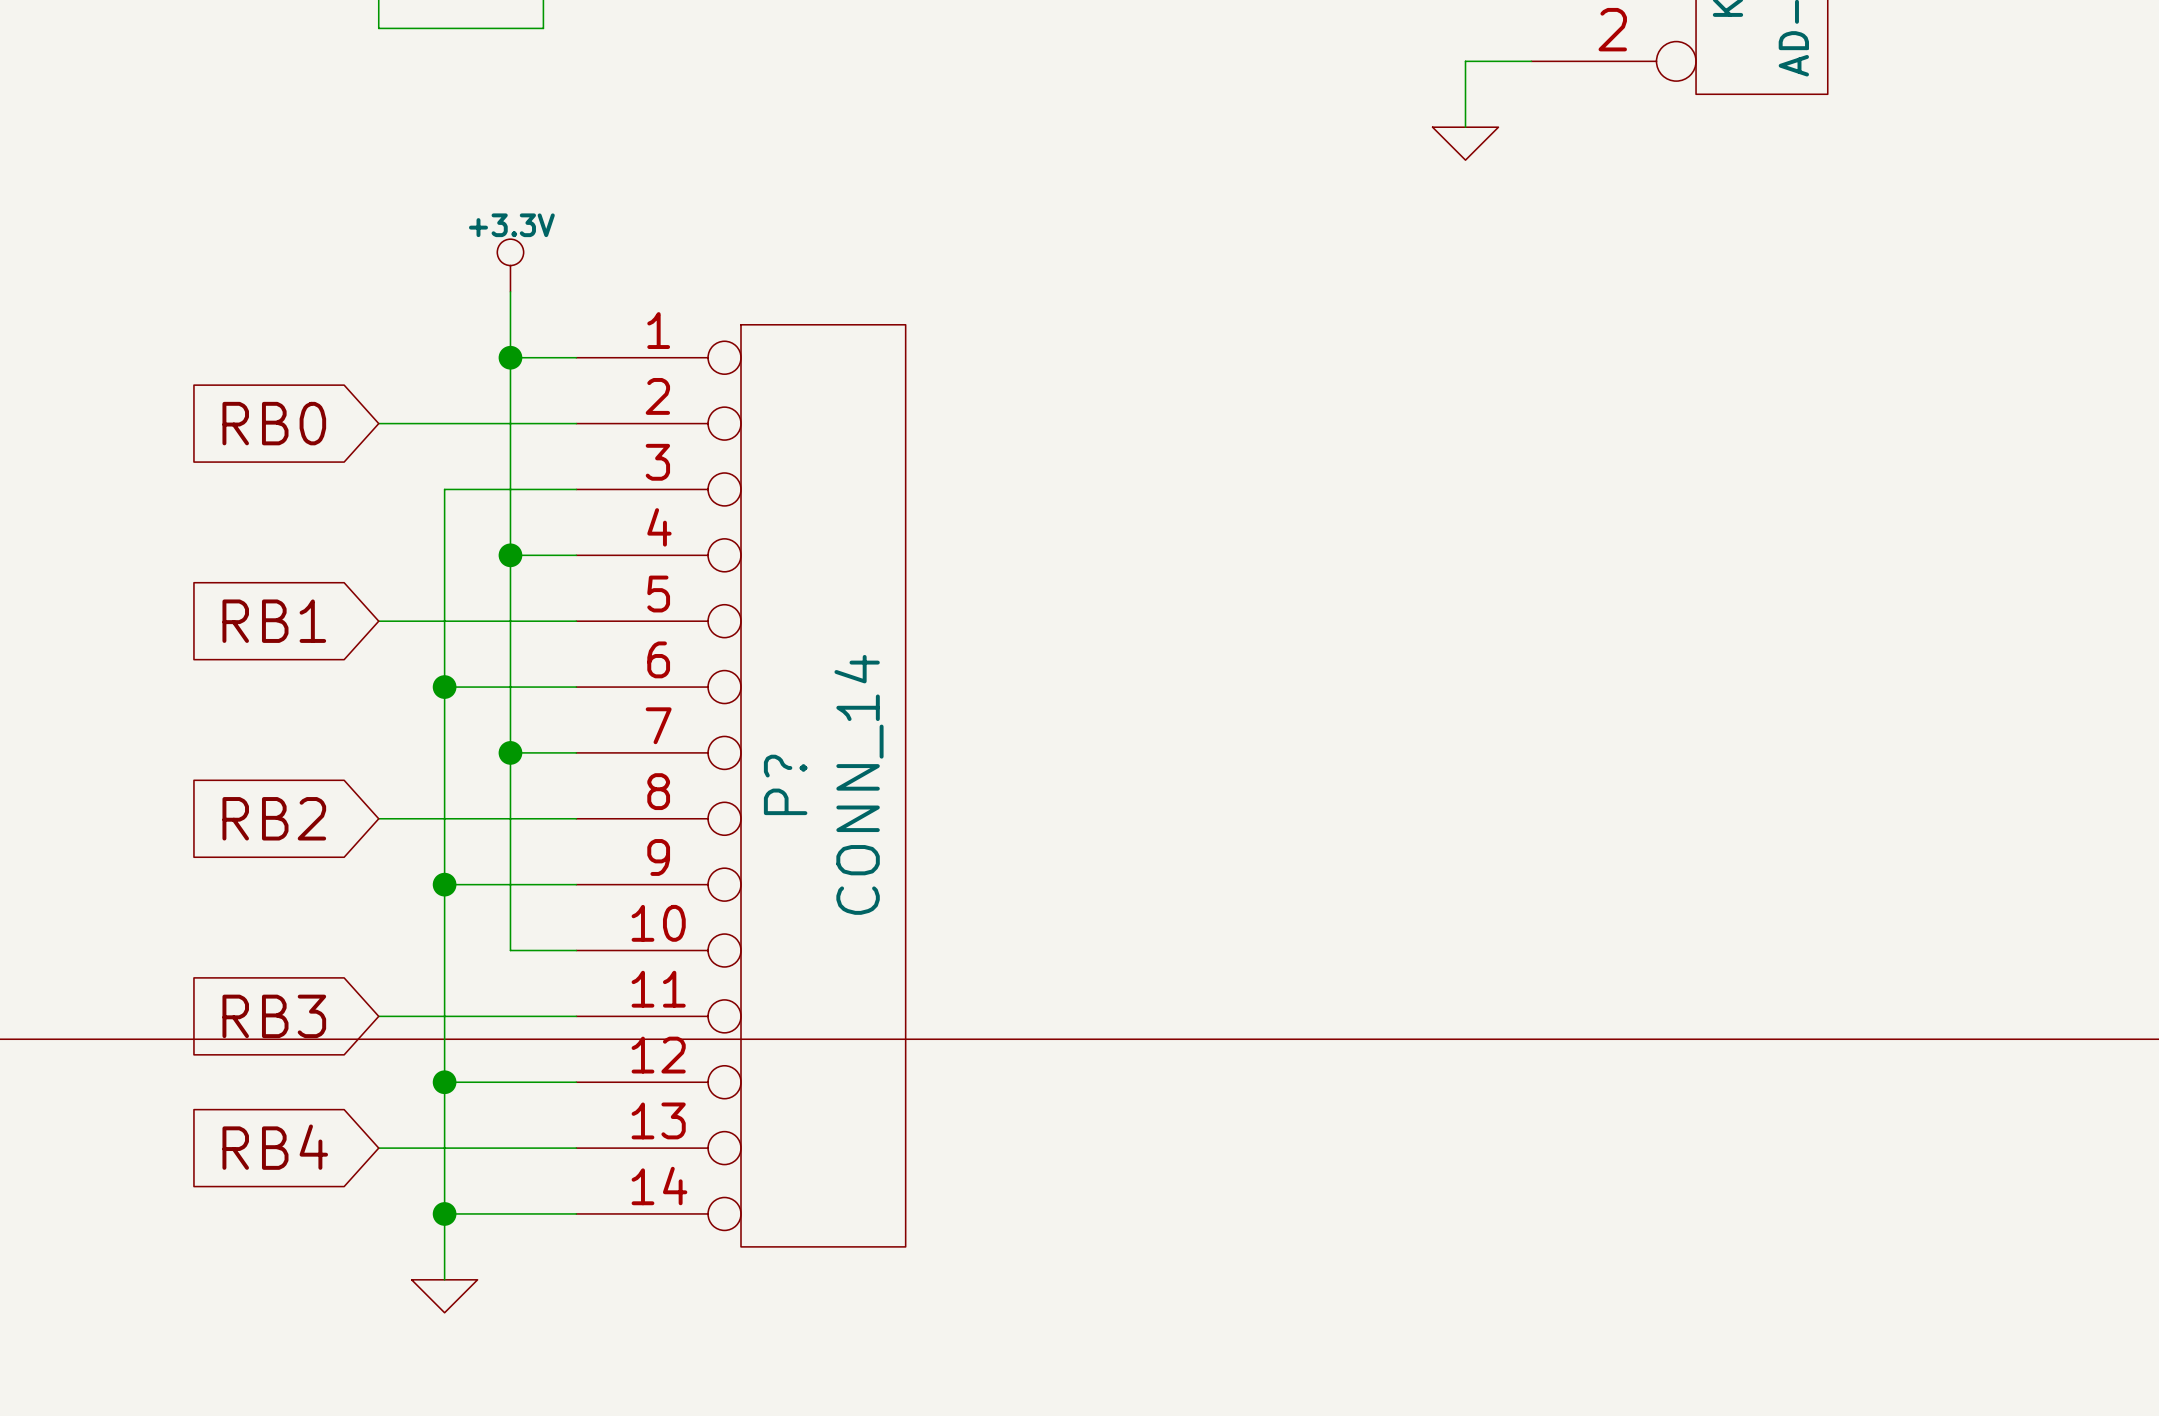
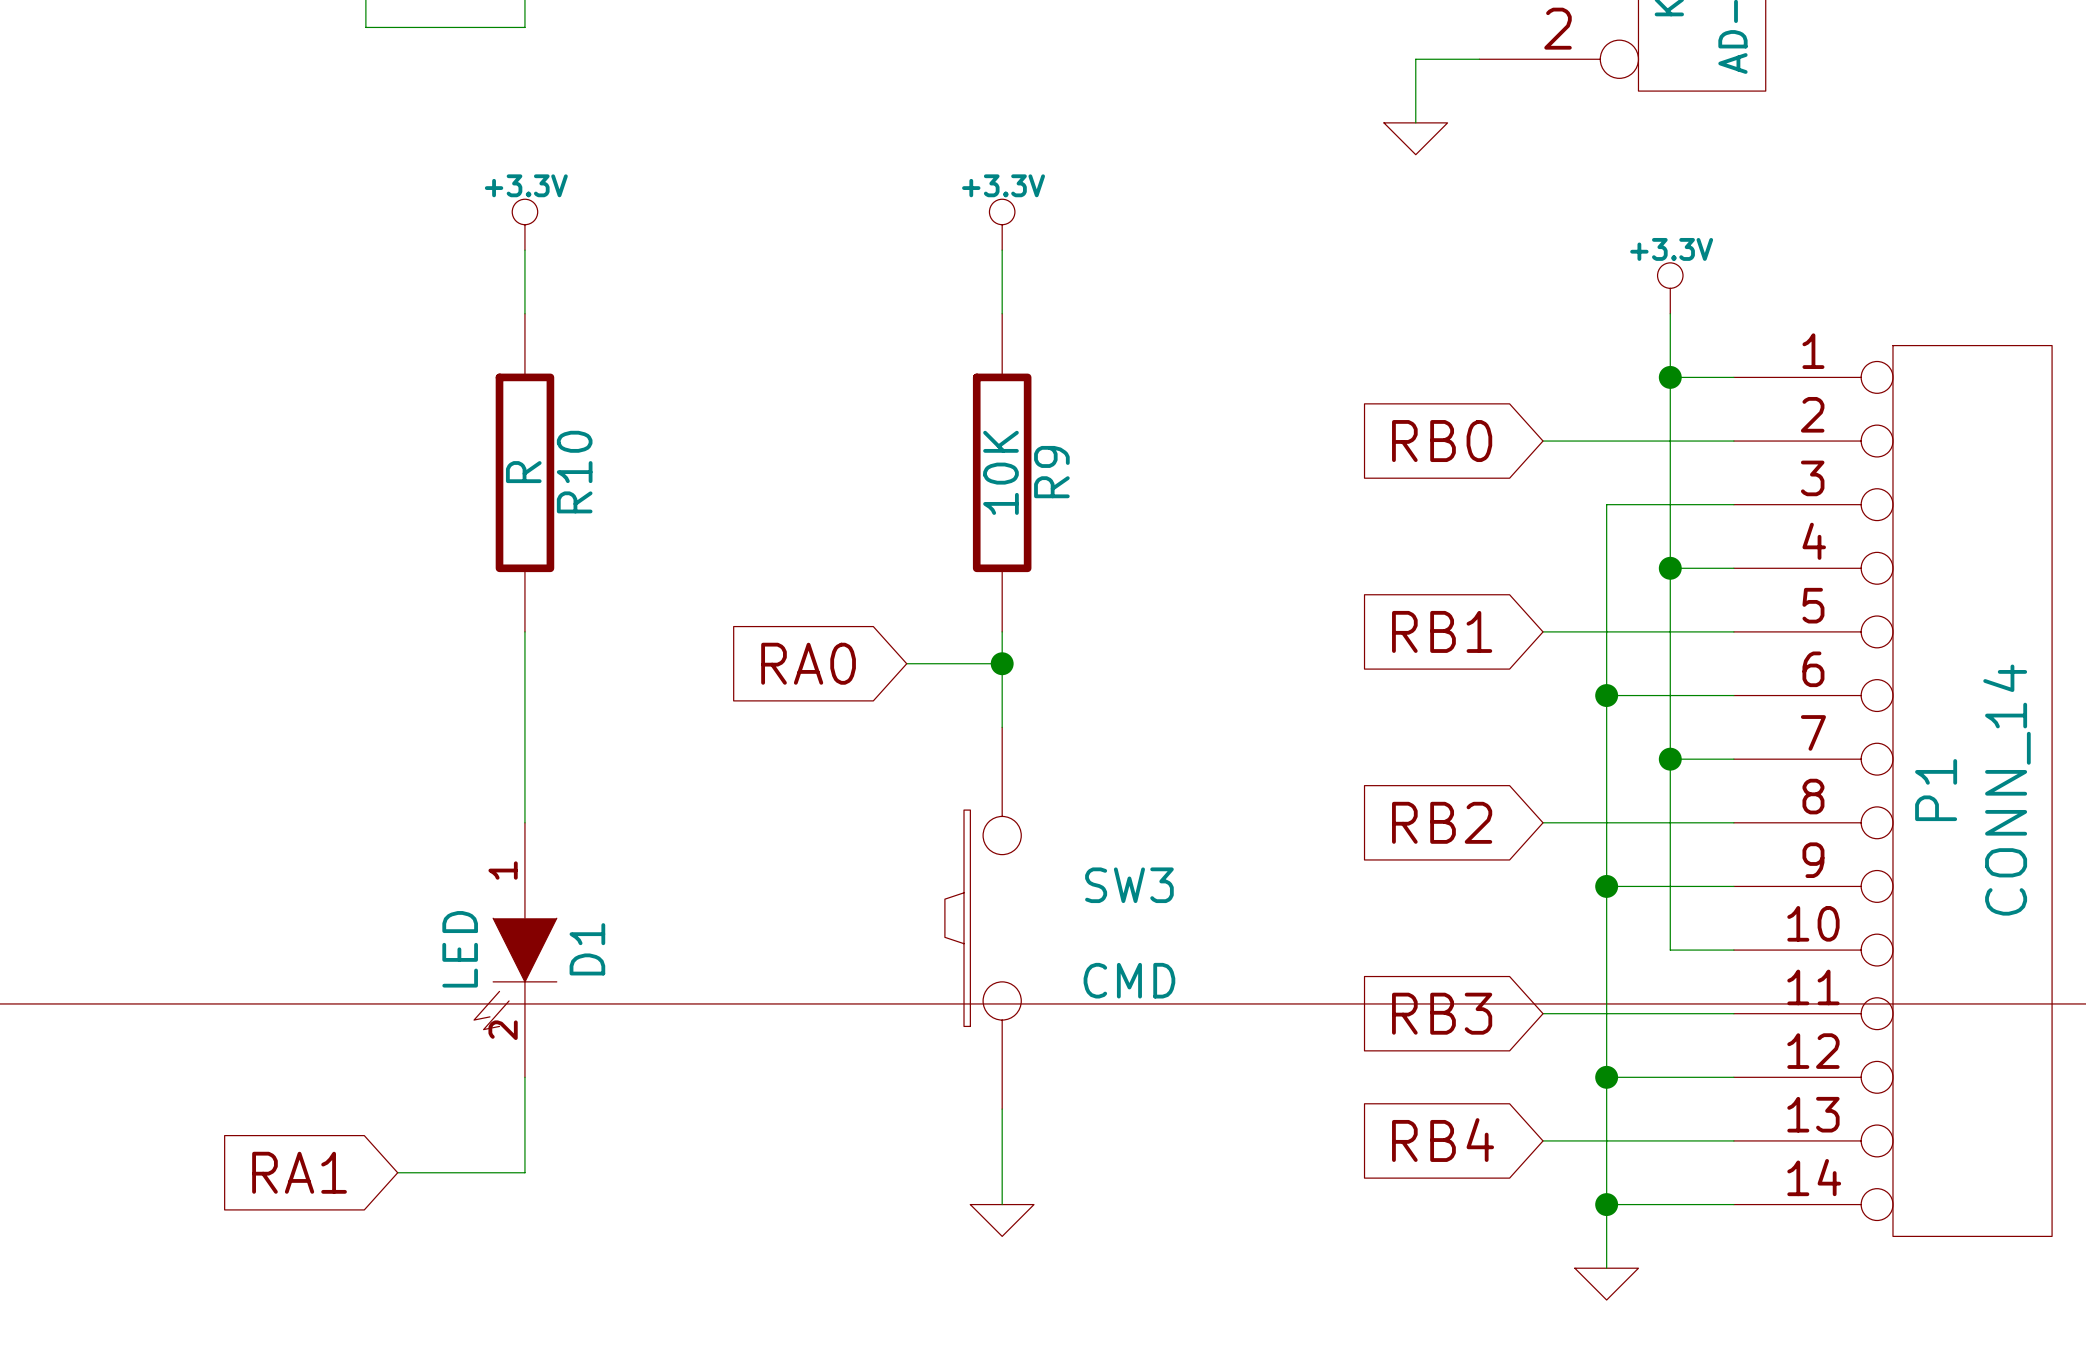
power symbol: none -> +3.3V (1002, 224)
wire: none -> (524, 250) (524, 313)
wire: none -> (1002, 250) (1002, 313)
power symbol position: +3.3V (510, 265) -> +3.3V (524, 224)
wire: (510, 291) (510, 950) (576, 950) -> none
power symbol: none -> +3.3V (1670, 288)
wire: none -> (1670, 313) (1670, 950) (1733, 950)
wire: (510, 357) (576, 357) -> none
junction: (510, 357) -> none
wire: none -> (1670, 377) (1733, 377)
junction: none -> (1670, 377)
global label: RB0 (274, 423) -> none
wire: (378, 423) (576, 423) -> none
global label: none -> RB0 (1442, 441)
wire: none -> (1543, 441) (1733, 441)
R10: none -> R (524, 472)
wire: (576, 489) (444, 489) (444, 1279) -> none
R9: none -> 10K (1002, 472)
wire: none -> (1733, 504) (1606, 504) (1606, 1268)
wire: (510, 555) (576, 555) -> none
junction: (510, 555) -> none
wire: none -> (1670, 568) (1733, 568)
junction: none -> (1670, 568)
global label: RB1 (274, 621) -> none
wire: (378, 621) (576, 621) -> none
wire: none -> (524, 631) (524, 822)
wire: none -> (1002, 631) (1002, 727)
global label: none -> RB1 (1442, 631)
wire: none -> (1543, 631) (1733, 631)
wire: (444, 687) (576, 687) -> none
junction: (444, 687) -> none
global label: none -> RA0 (808, 663)
wire: none -> (906, 663) (1002, 663)
junction: none -> (1002, 663)
wire: none -> (1606, 695) (1733, 695)
junction: none -> (1606, 695)
wire: (510, 752) (576, 752) -> none
junction: (510, 752) -> none
P?: CONN_14 (741, 785) -> none
wire: none -> (1670, 759) (1733, 759)
junction: none -> (1670, 759)
global label: RB2 (274, 818) -> none
wire: (378, 818) (576, 818) -> none
P1: none -> CONN_14 (1892, 790)
global label: none -> RB2 (1442, 822)
wire: none -> (1543, 822) (1733, 822)
wire: (444, 884) (576, 884) -> none
junction: (444, 884) -> none
wire: none -> (1606, 886) (1733, 886)
junction: none -> (1606, 886)
SW3: none -> CMD (983, 918)
D1: none -> LED (515, 950)
global label: RB3 (274, 1016) -> none
wire: (378, 1016) (576, 1016) -> none
global label: none -> RB3 (1442, 1013)
wire: none -> (1543, 1013) (1733, 1013)
wire: (444, 1082) (576, 1082) -> none
junction: (444, 1082) -> none
wire: none -> (1606, 1077) (1733, 1077)
junction: none -> (1606, 1077)
global label: RB4 (275, 1147) -> none
wire: (378, 1148) (576, 1148) -> none
wire: none -> (1002, 1109) (1002, 1204)
global label: none -> RB4 (1443, 1140)
wire: none -> (1543, 1140) (1733, 1140)
global label: none -> RA1 (299, 1172)
wire: none -> (397, 1172) (429, 1172)
junction: (444, 1213) -> none
wire: (543, 1213) (576, 1213) -> (524, 1172) (524, 1077)
wire: none -> (1606, 1204) (1733, 1204)
junction: none -> (1606, 1204)
power symbol position: (444, 1296) -> (1002, 1220)
power symbol: none -> (1606, 1284)

